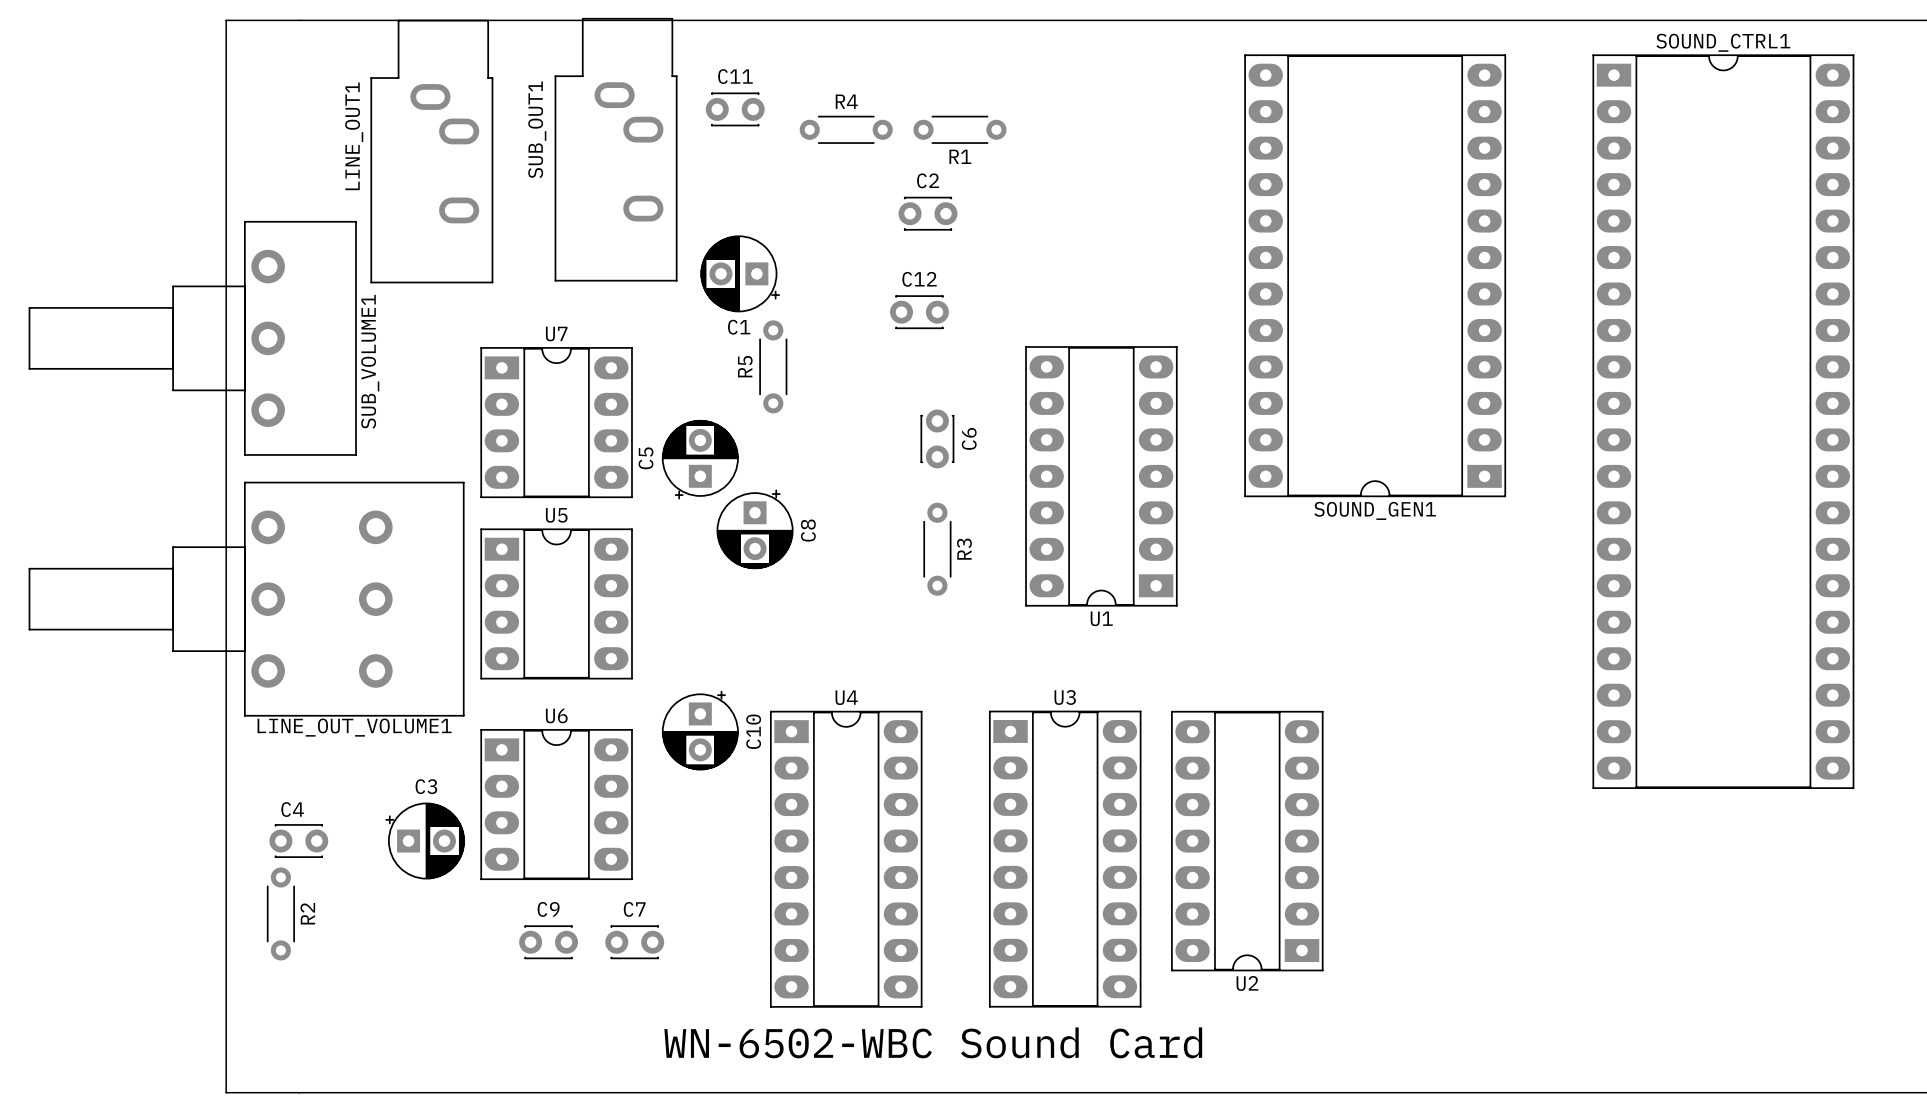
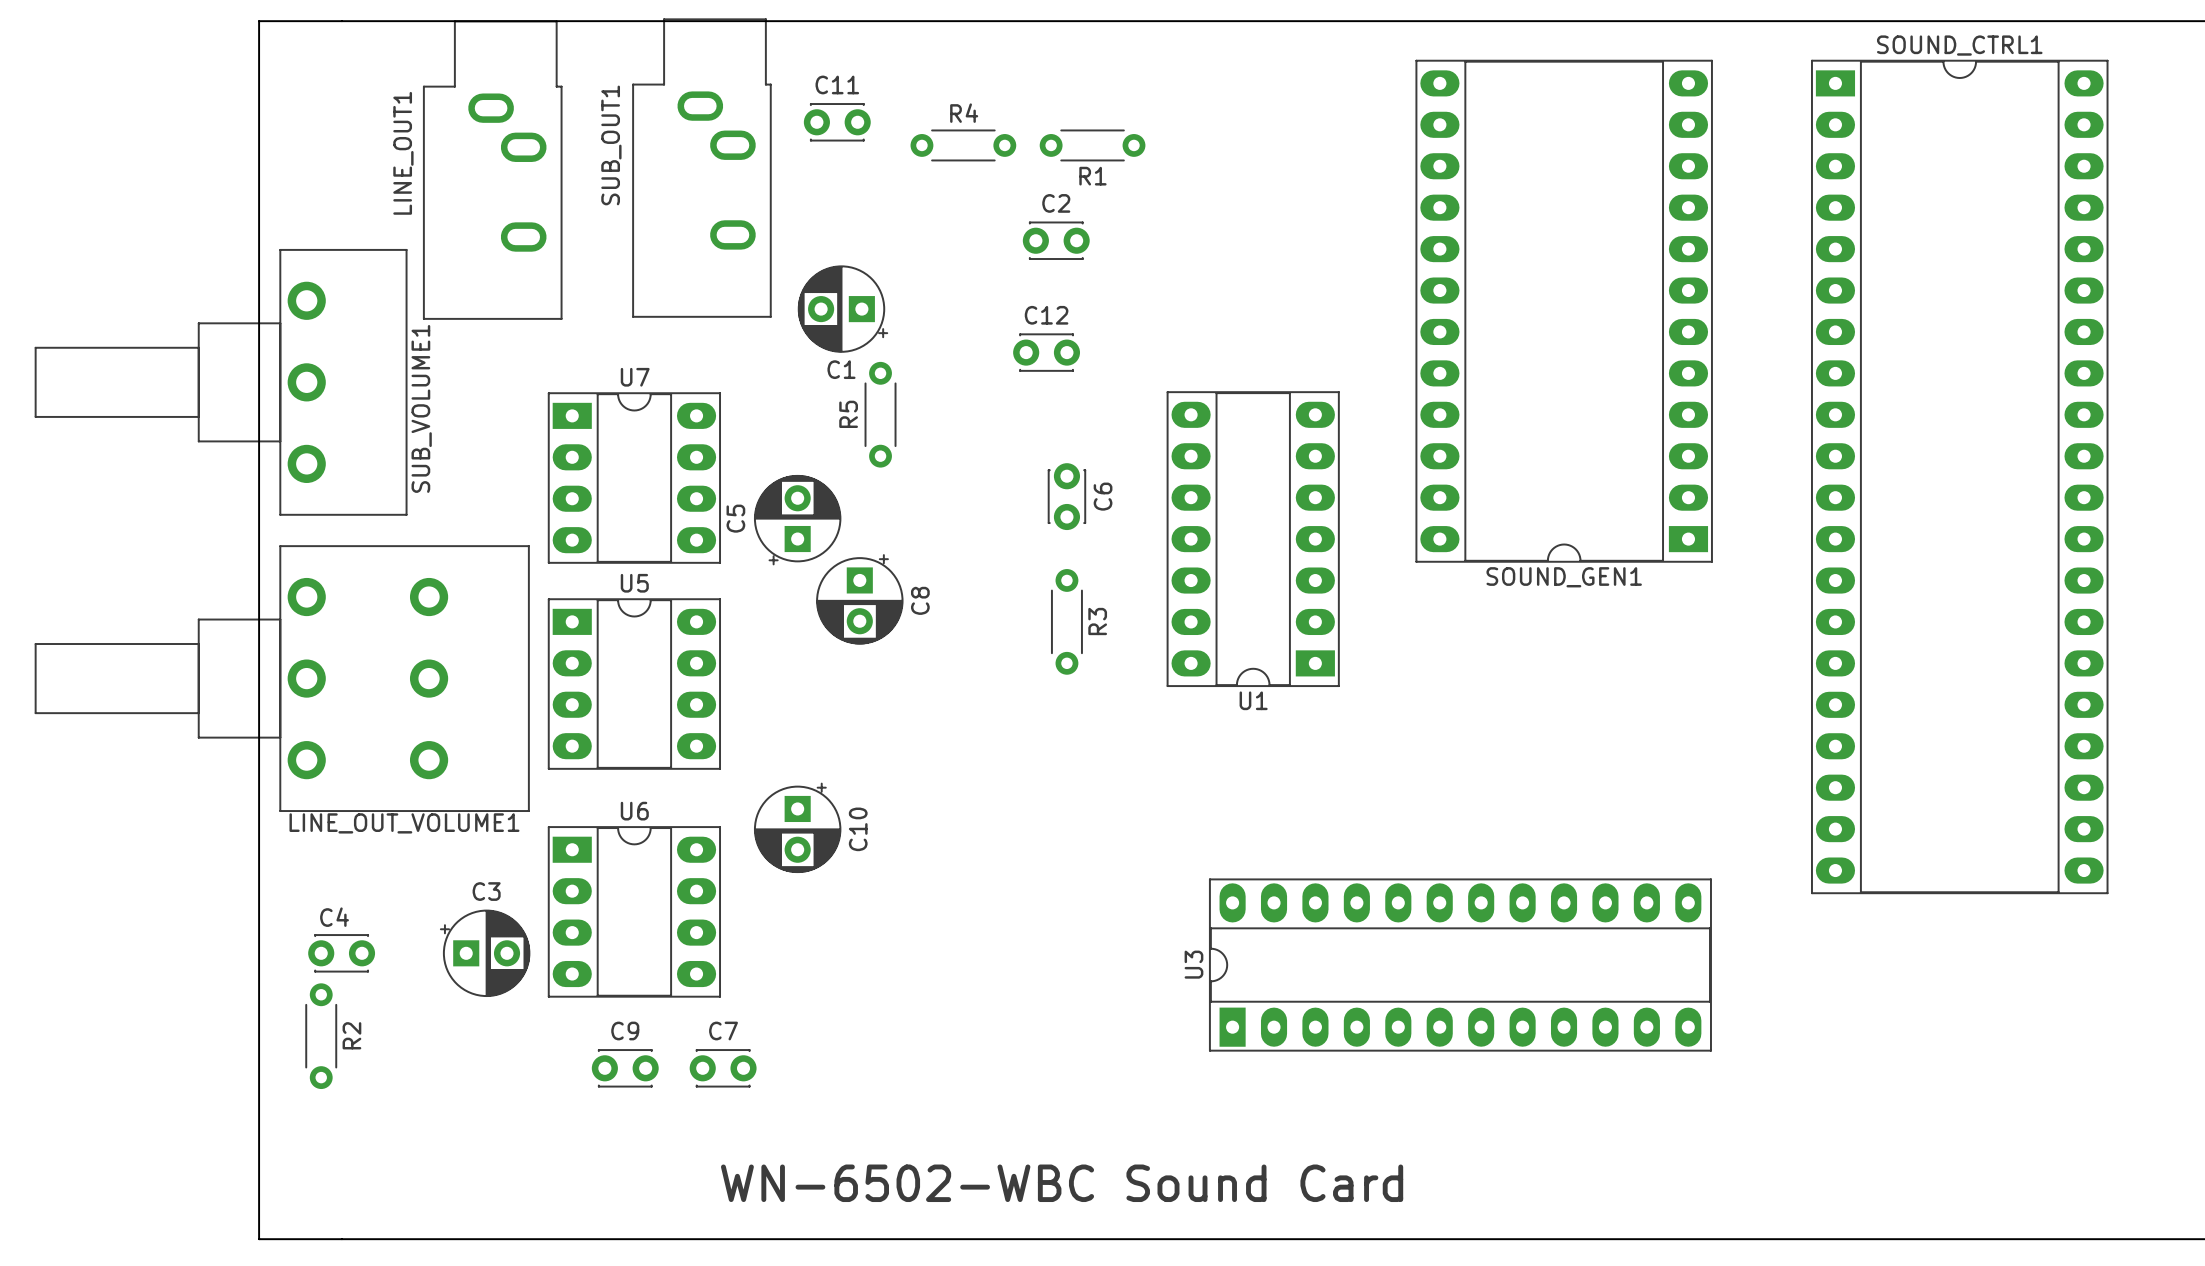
U3 name position: U3 (1065, 697) -> U3 (1193, 964)
U3 footprint: [988, 710, 1142, 1008] -> [1208, 878, 1712, 1052]
U2: (1247, 841) -> none
U4: (846, 859) -> none

